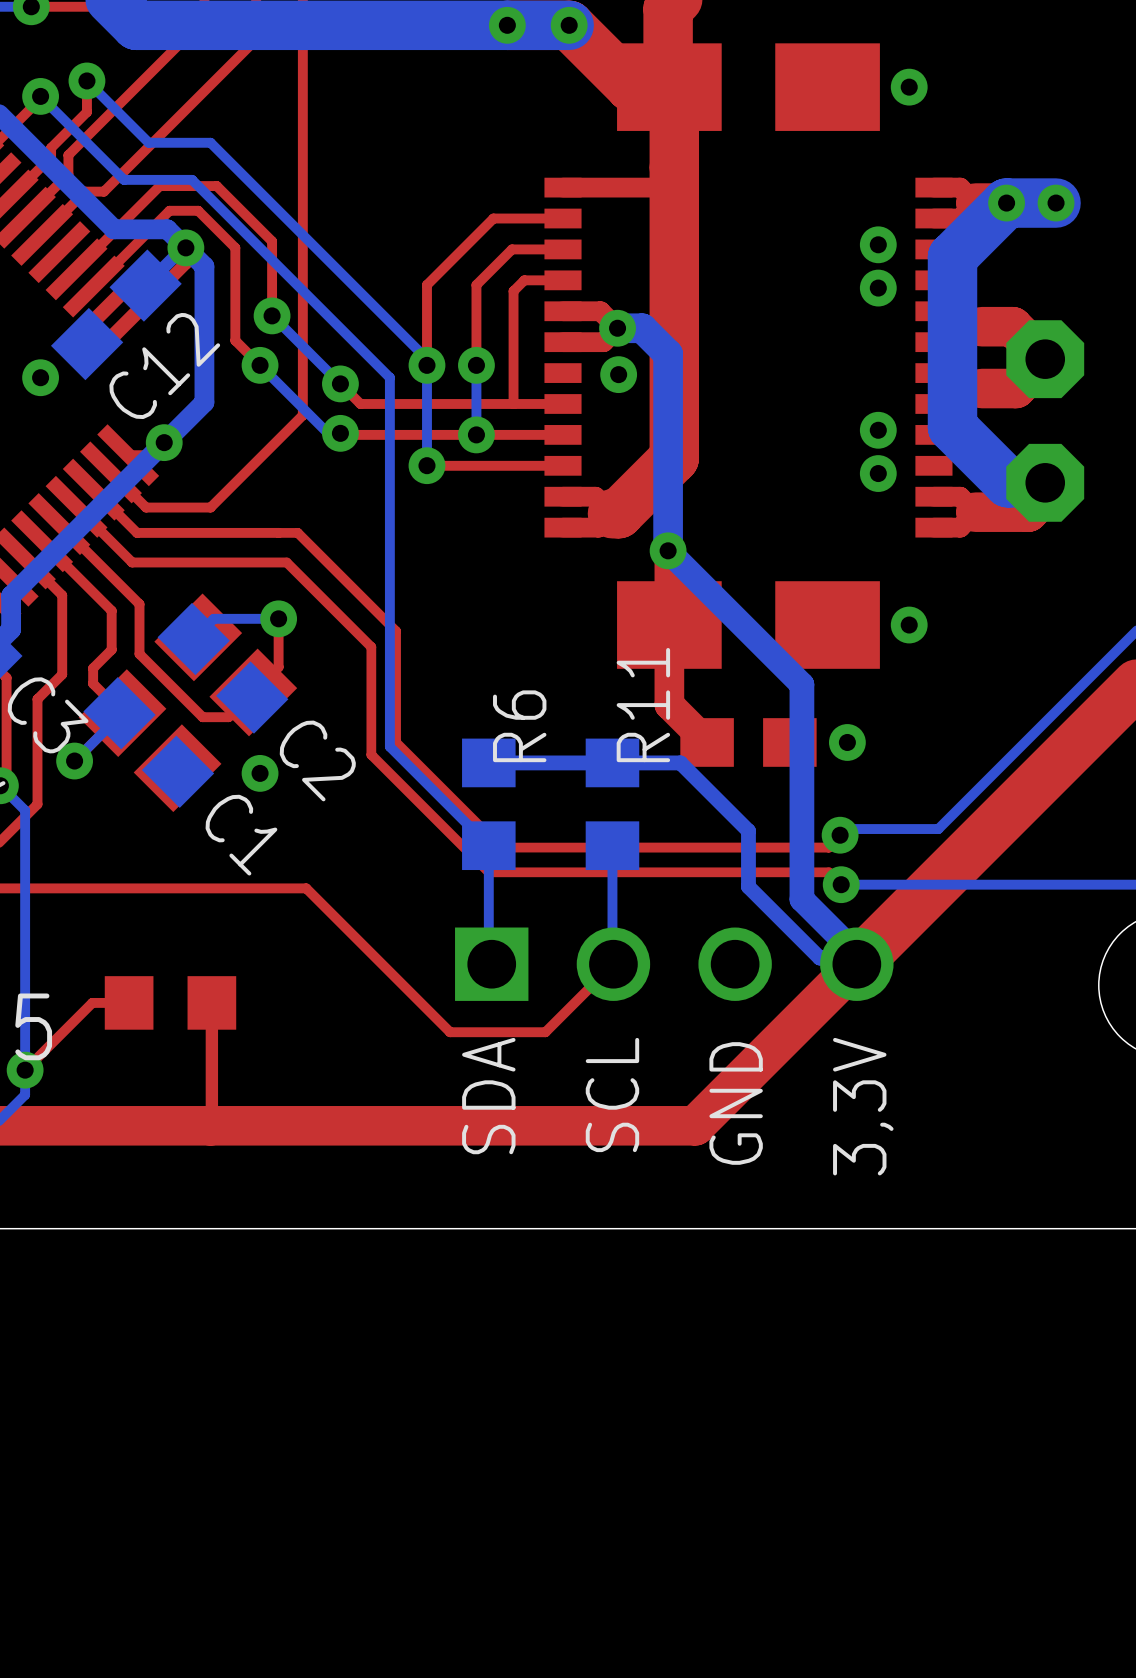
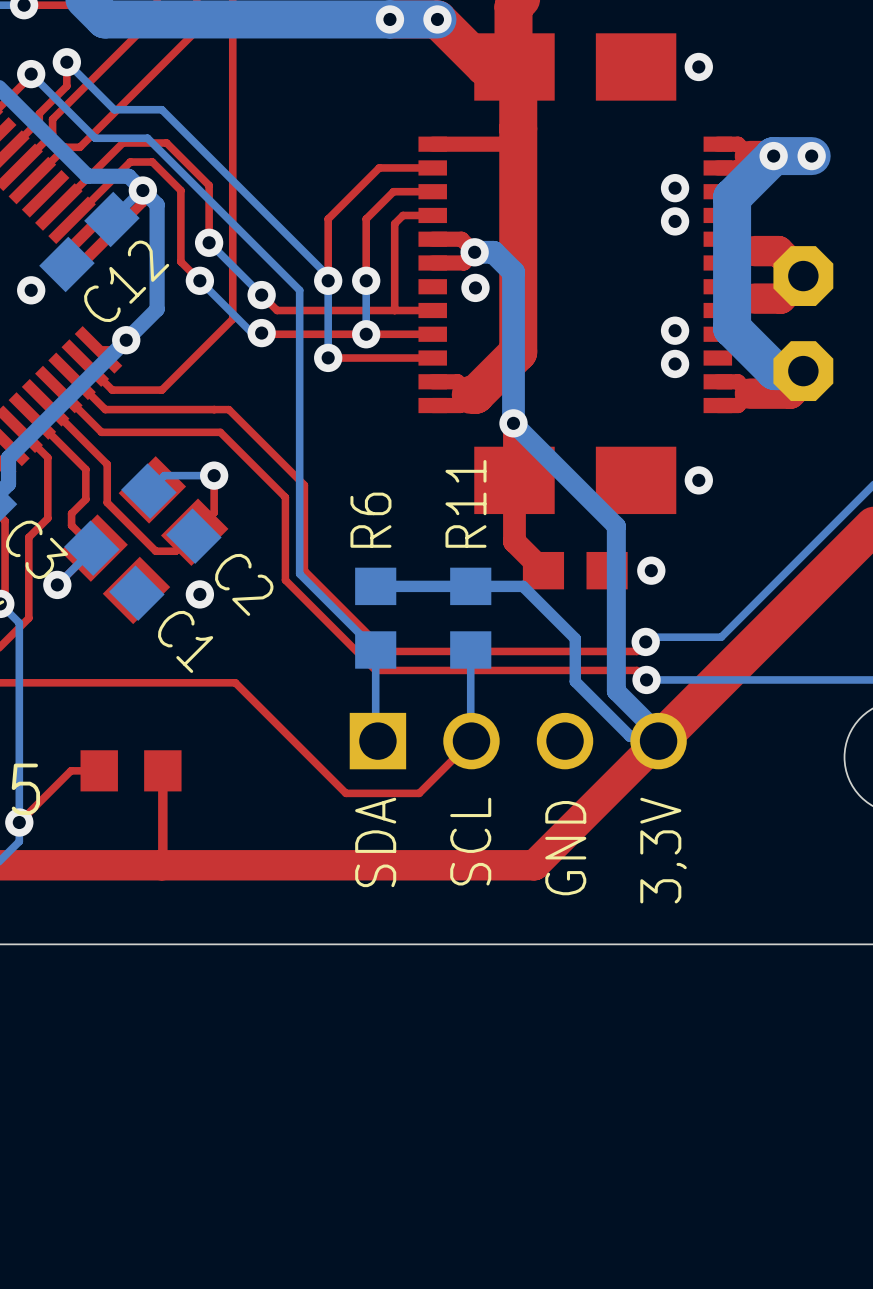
R11 name position: R11 (643, 705) -> R11 (465, 503)
R6 name position: R6 (519, 726) -> R6 (370, 520)

